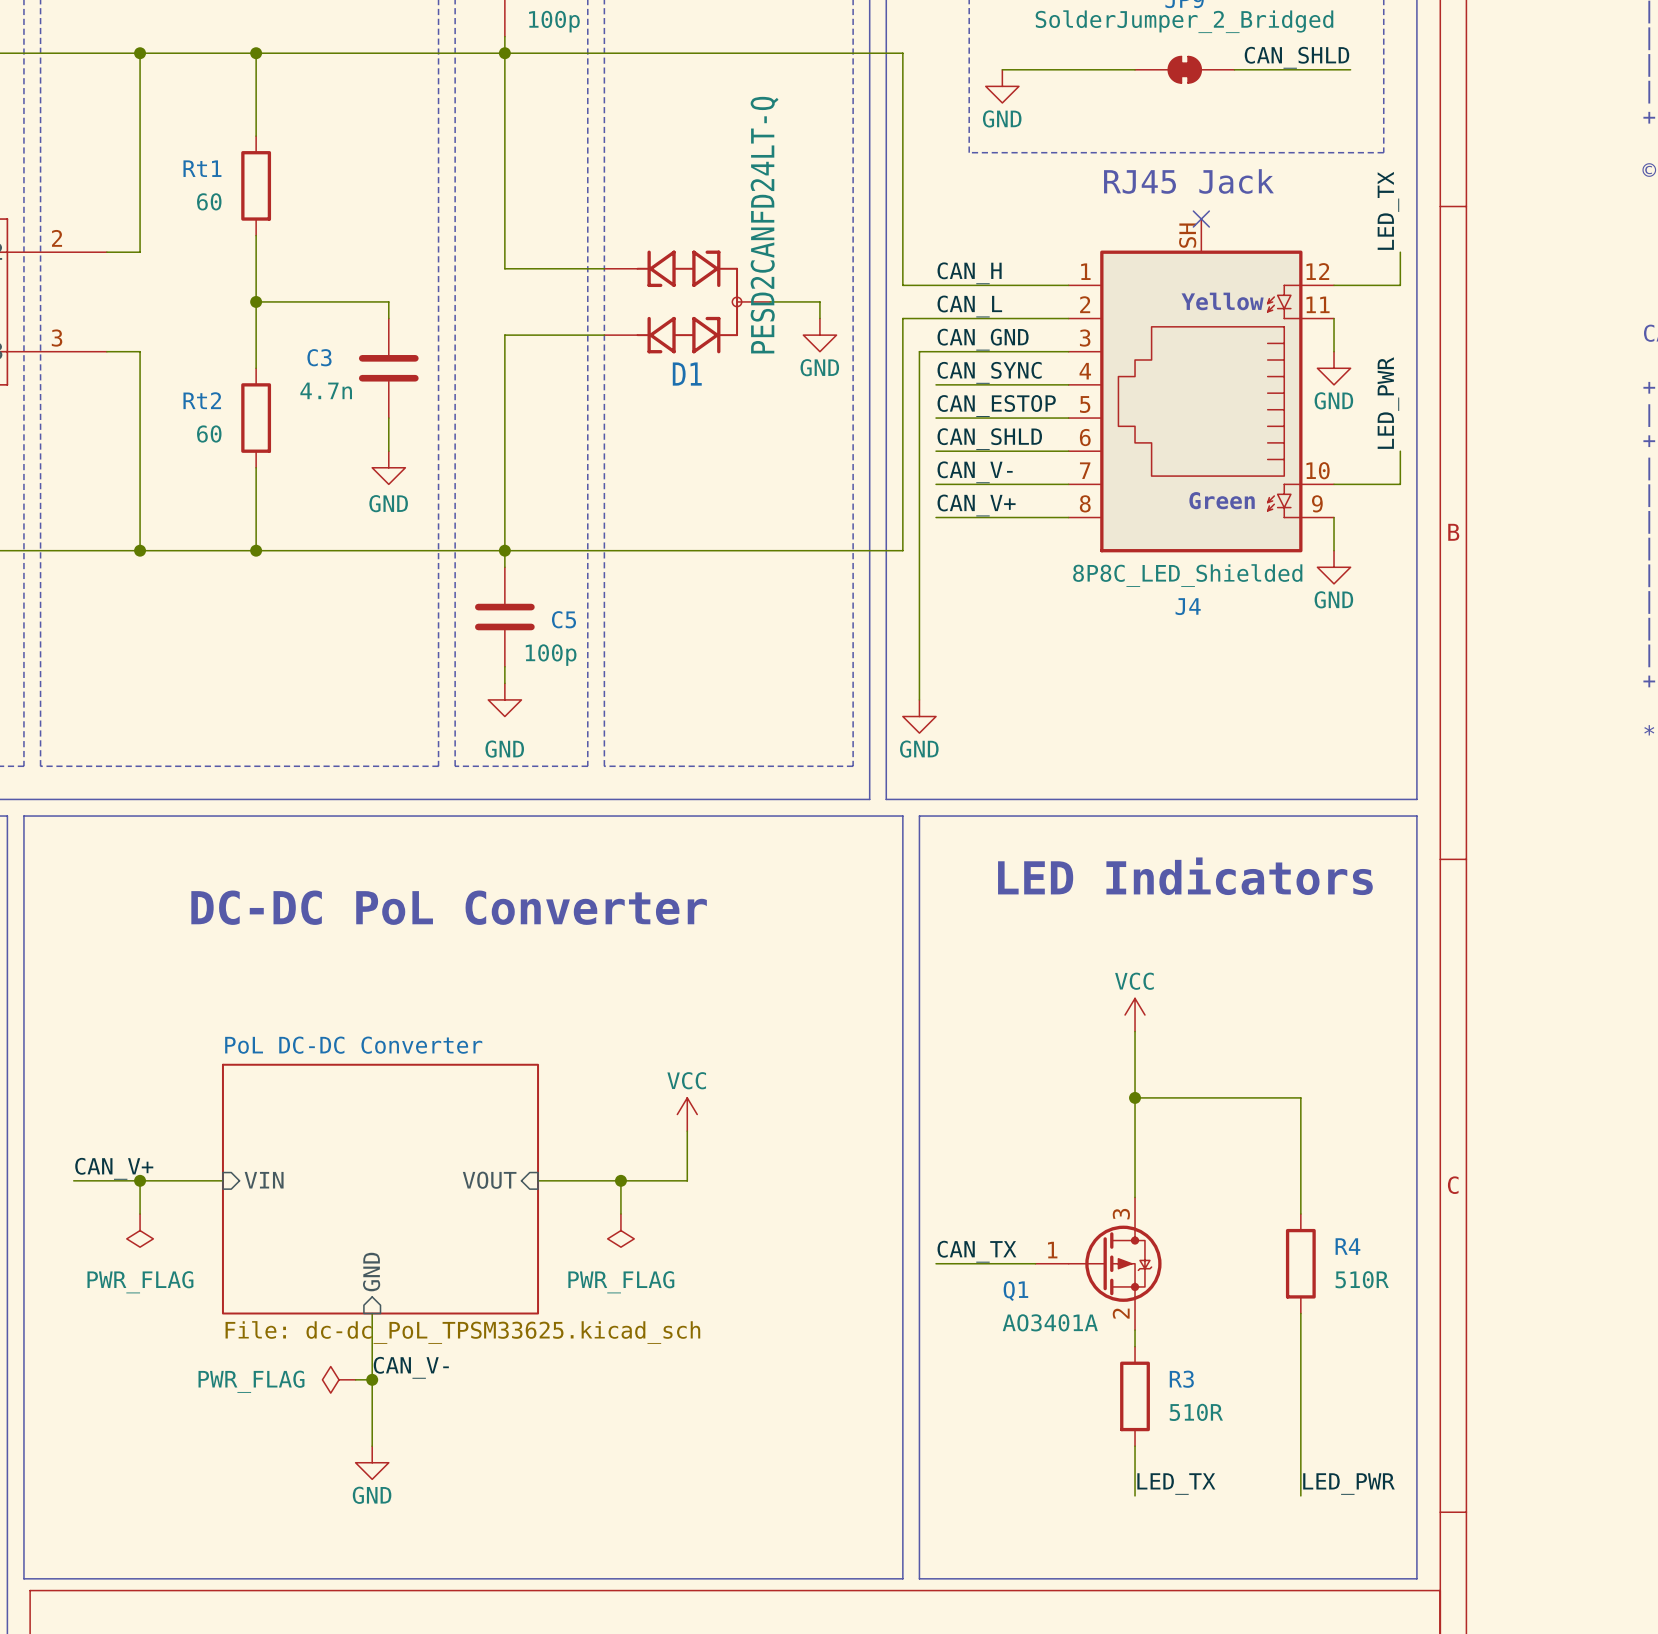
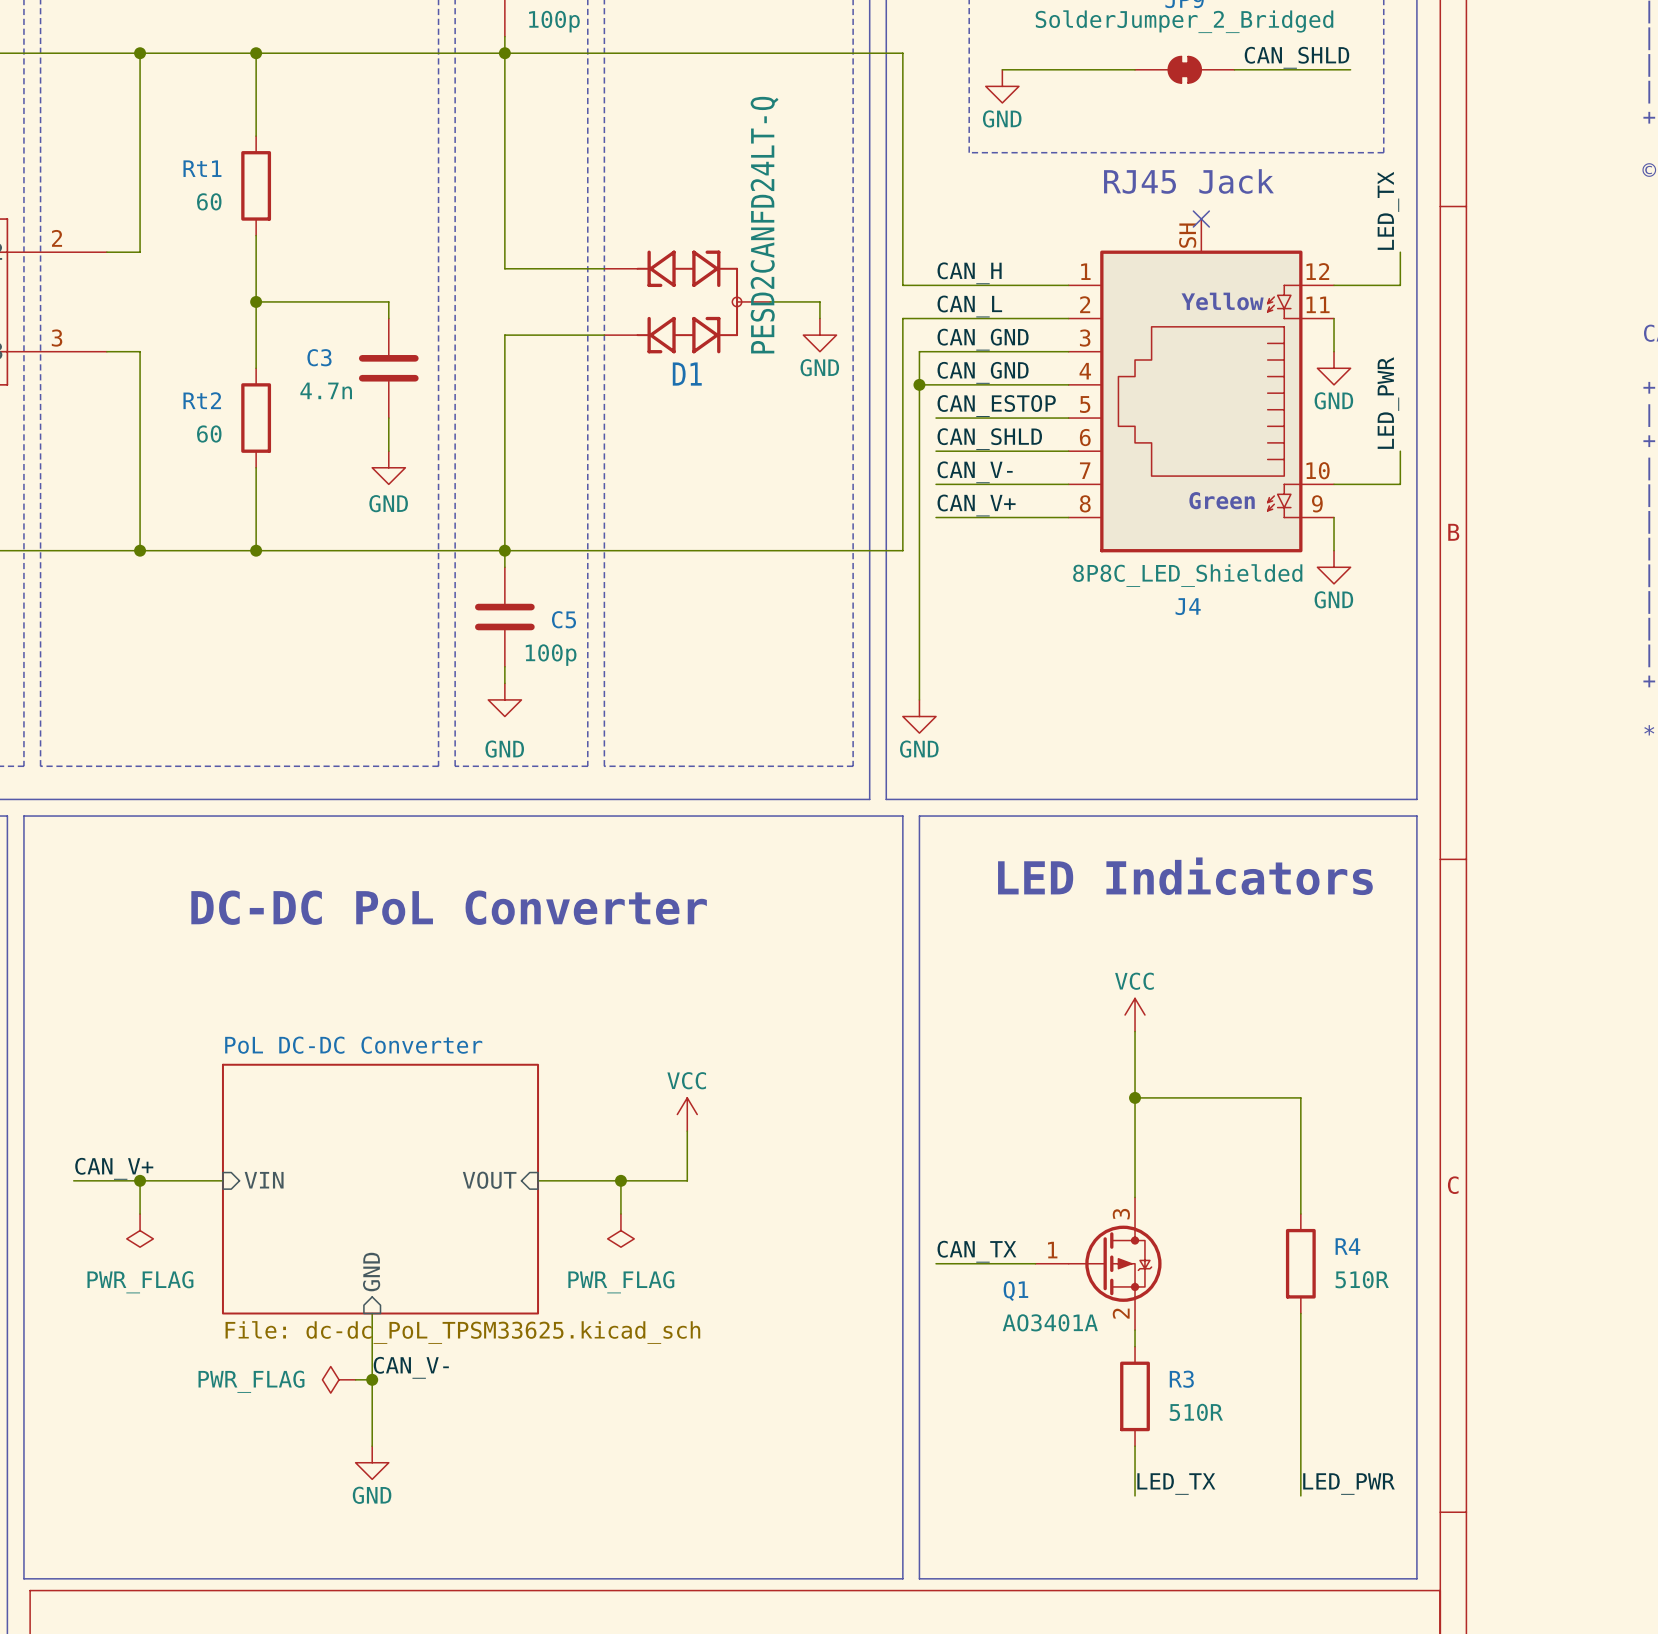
label: CAN_SYNC (989, 372) -> CAN_GND (983, 372)
wire: none -> (919, 384) (936, 384)
junction: none -> (919, 384)

